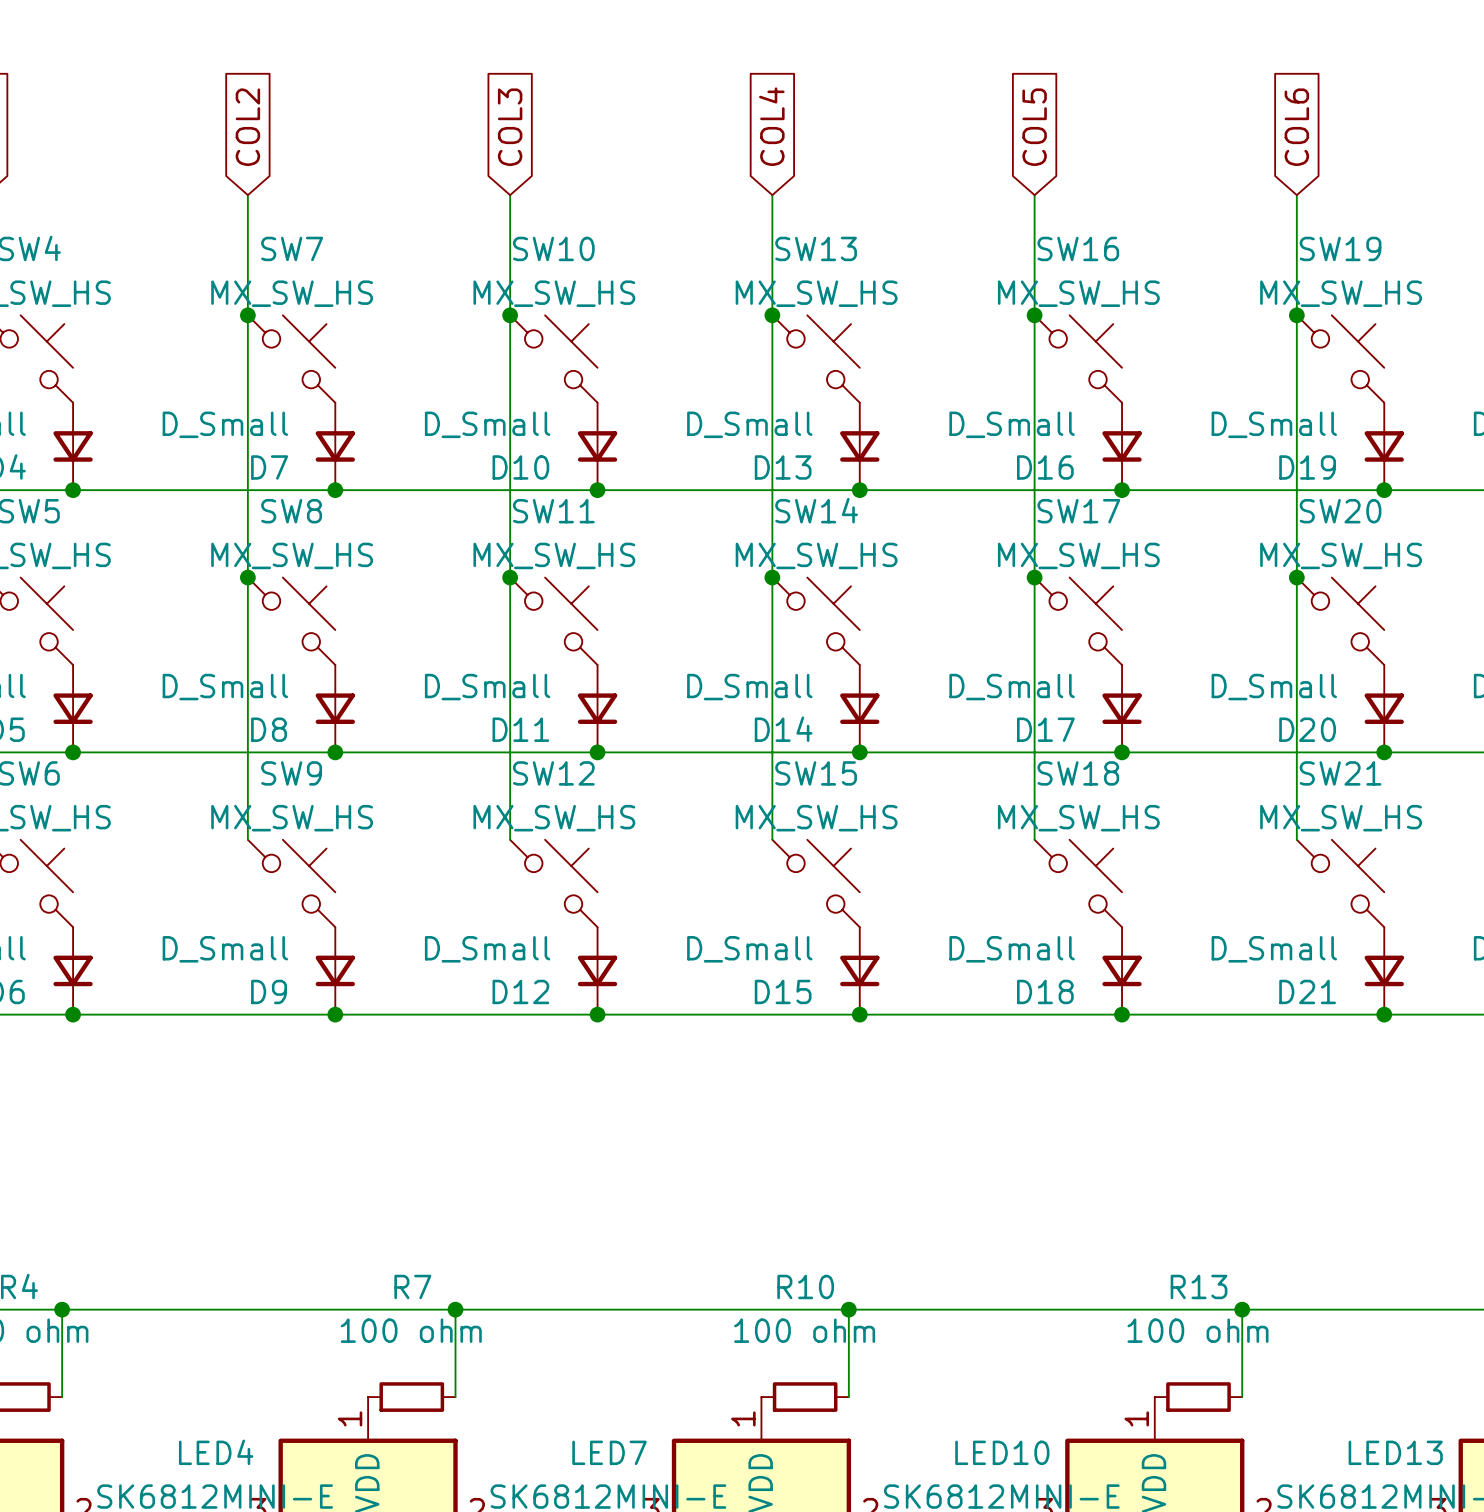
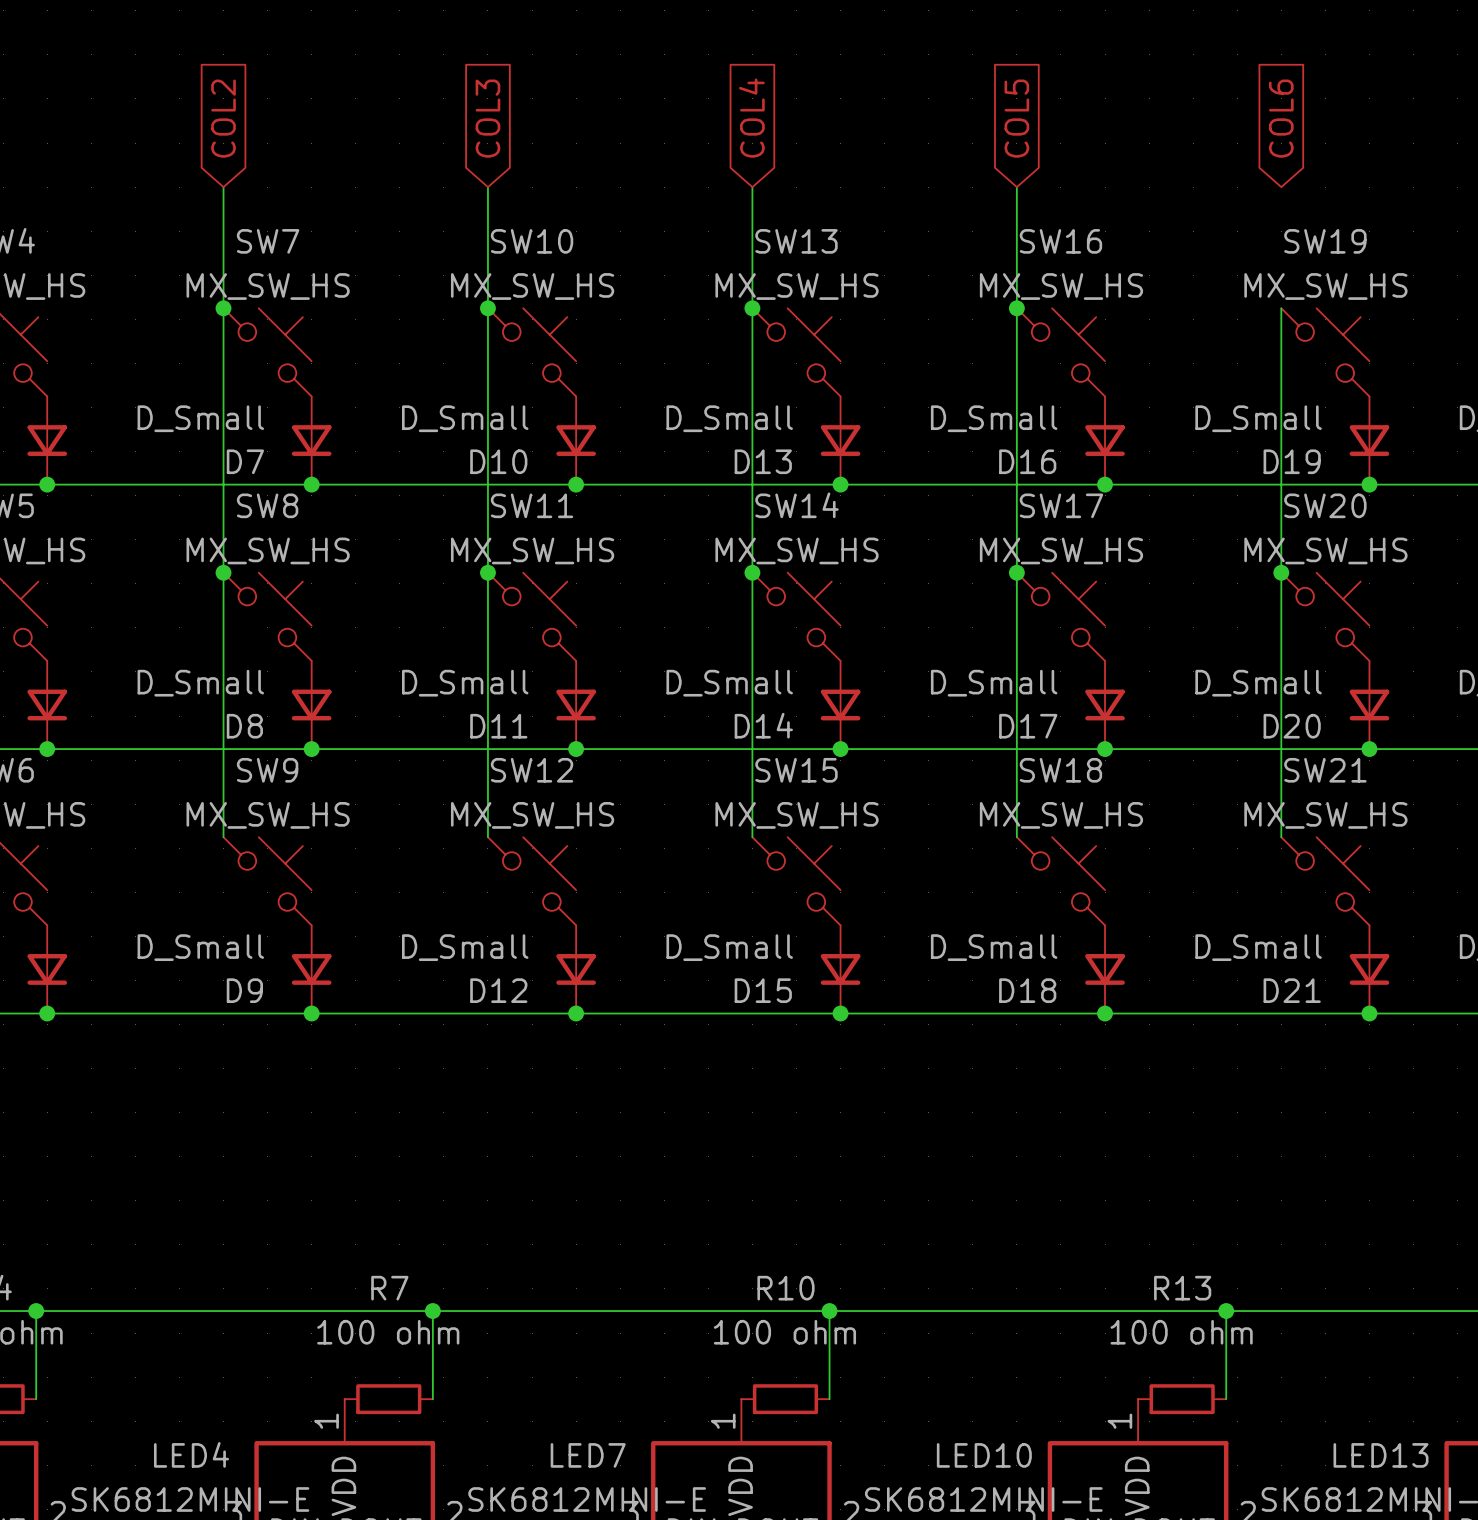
wire: (1296, 195) (1296, 315) -> none
junction: (1296, 315) -> none

